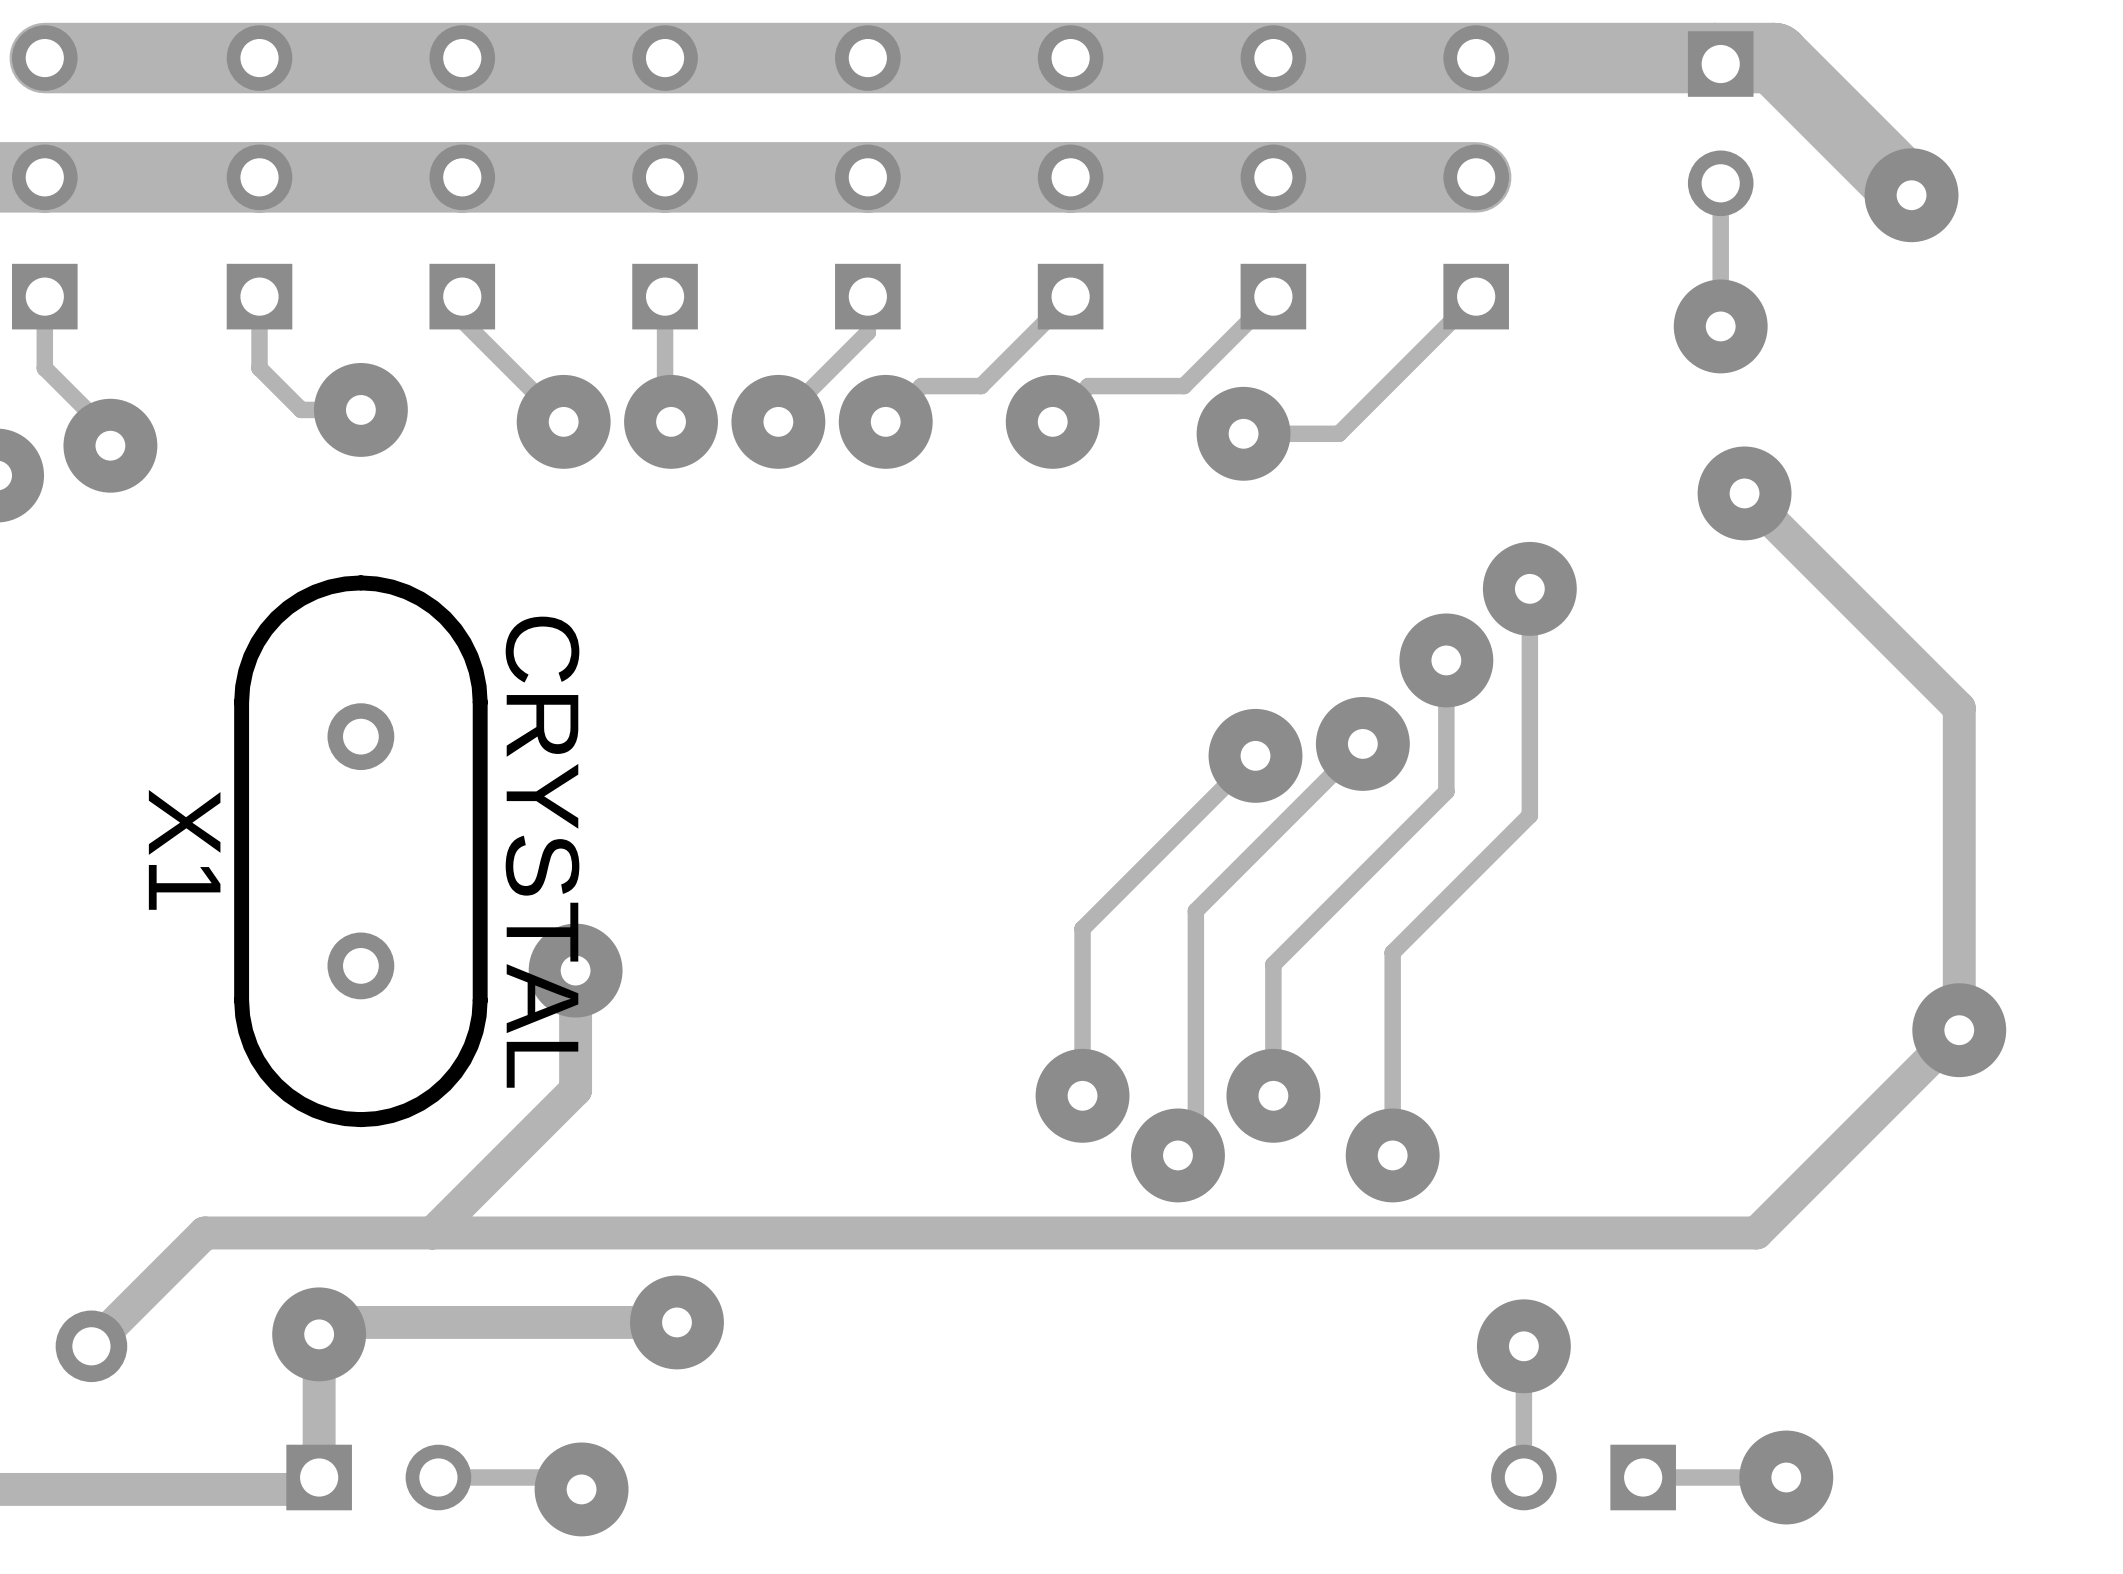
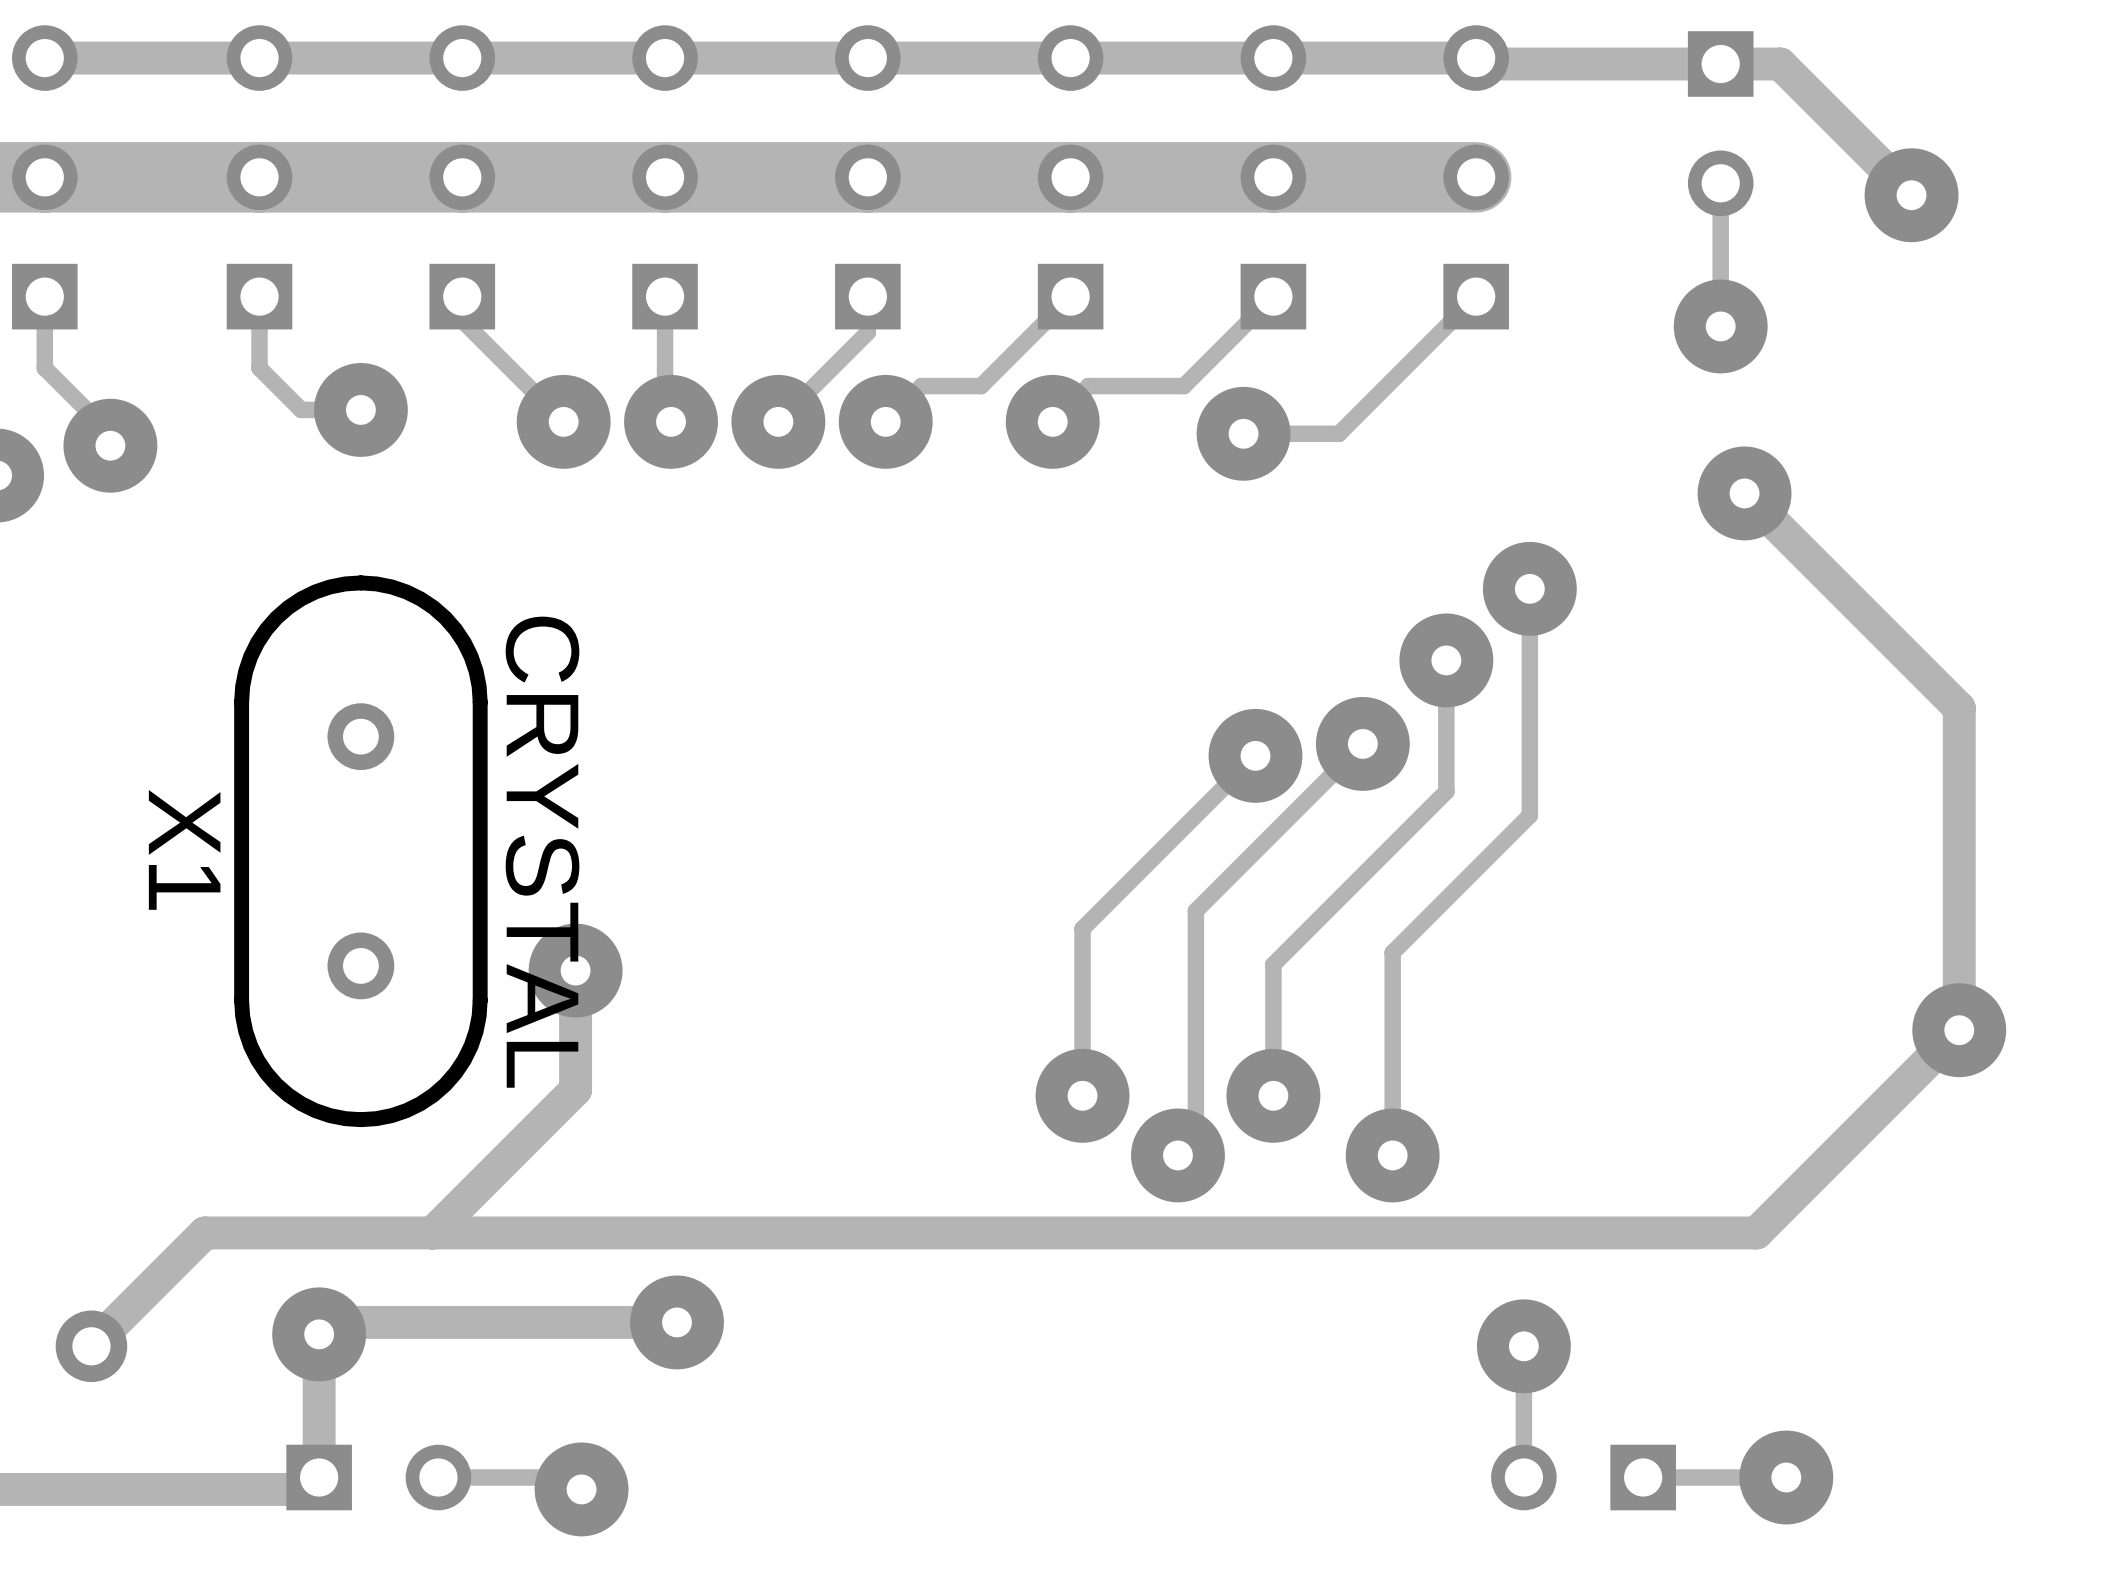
track: (44, 58) (1774, 58) (1911, 195) -> none

